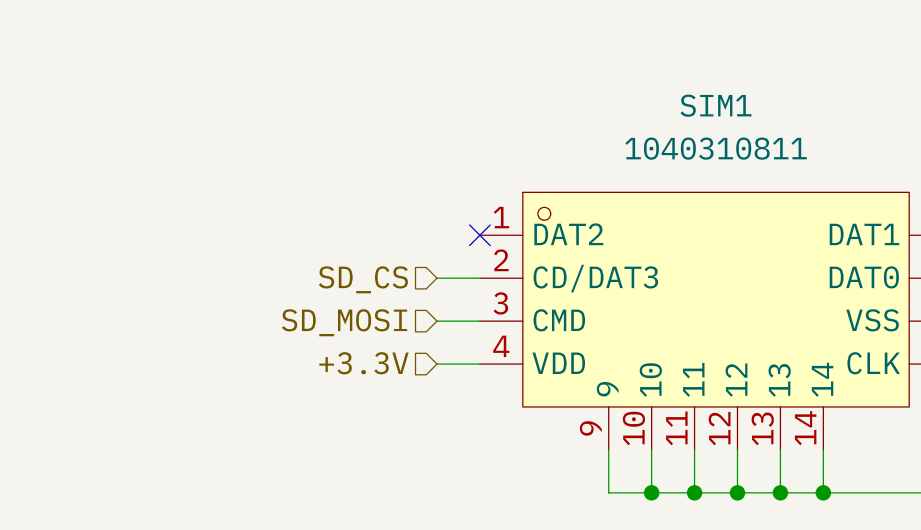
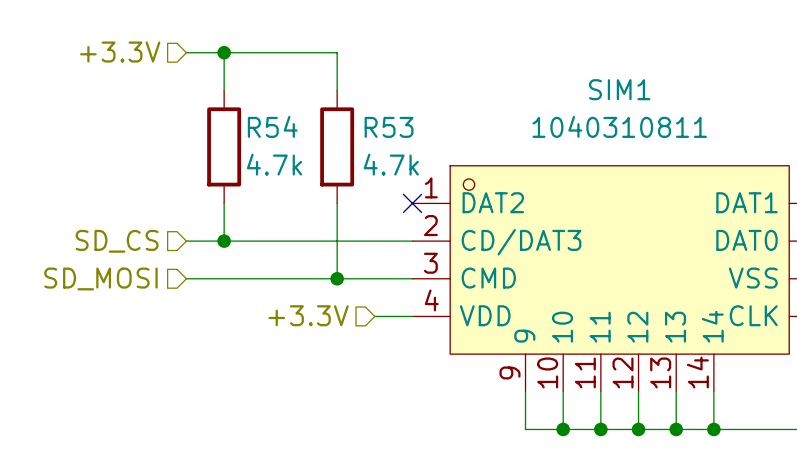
hierarchical label: none -> +3.3V (120, 52)
wire: none -> (186, 52) (337, 52) (337, 90)
wire: none -> (224, 52) (224, 90)
junction: none -> (224, 52)
R54: none -> 4.7k (224, 146)
R53: none -> 4.7k (337, 146)
wire: none -> (224, 203) (224, 241)
wire: none -> (337, 203) (337, 278)
wire: none -> (186, 241) (374, 241)
junction: none -> (224, 241)
hierarchical label position: SD_CS (363, 279) -> SD_CS (117, 241)
wire: none -> (186, 278) (374, 278)
junction: none -> (337, 278)
hierarchical label position: SD_MOSI (344, 322) -> SD_MOSI (100, 278)

